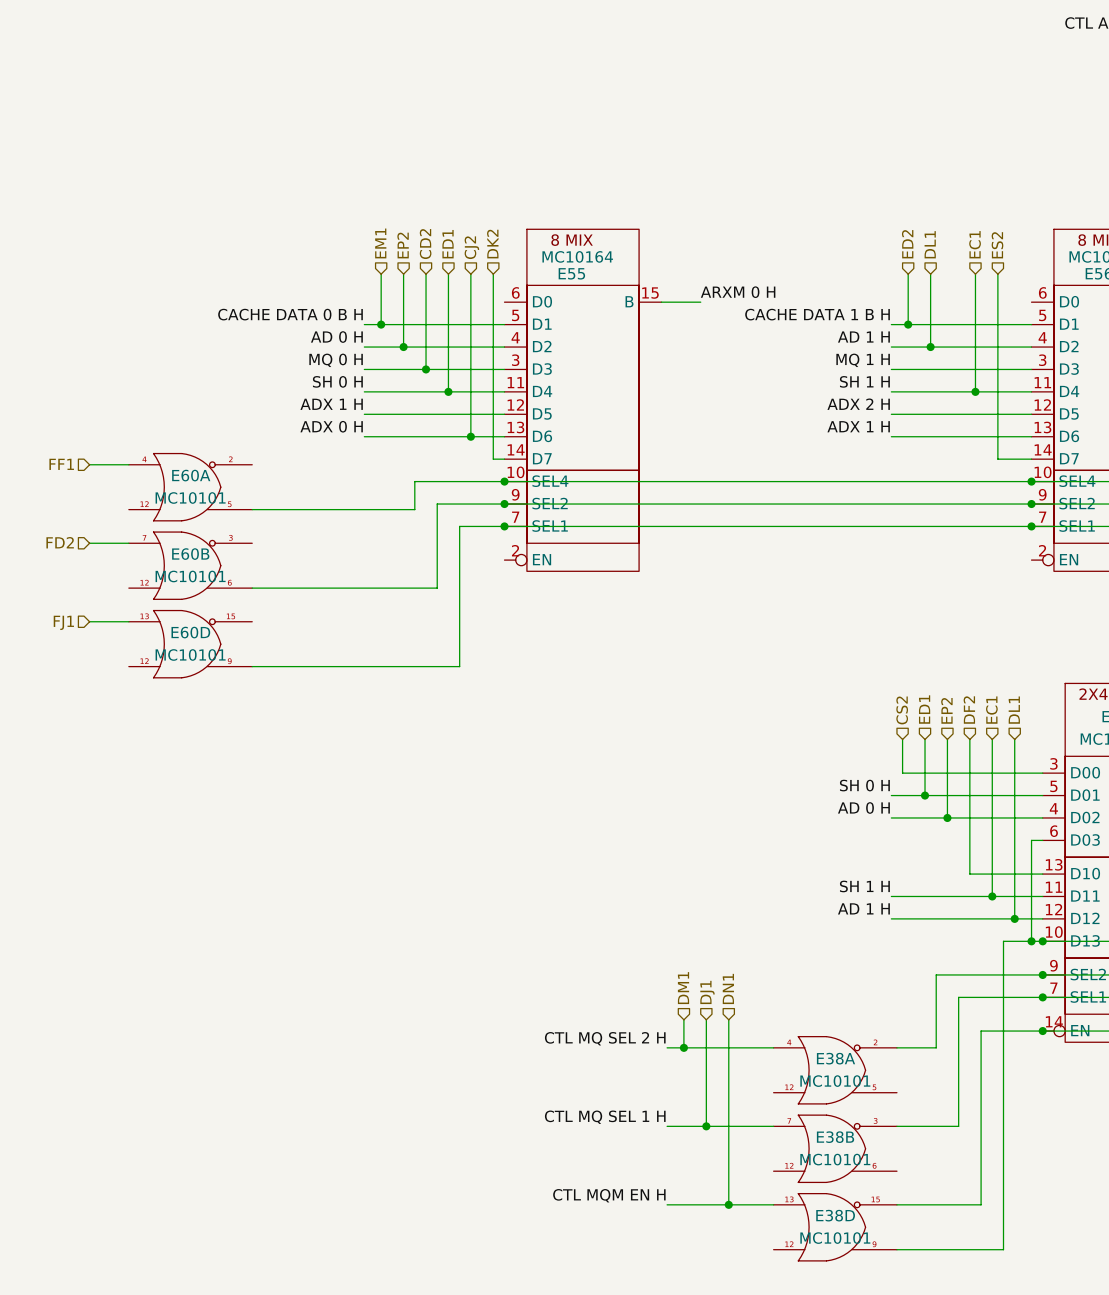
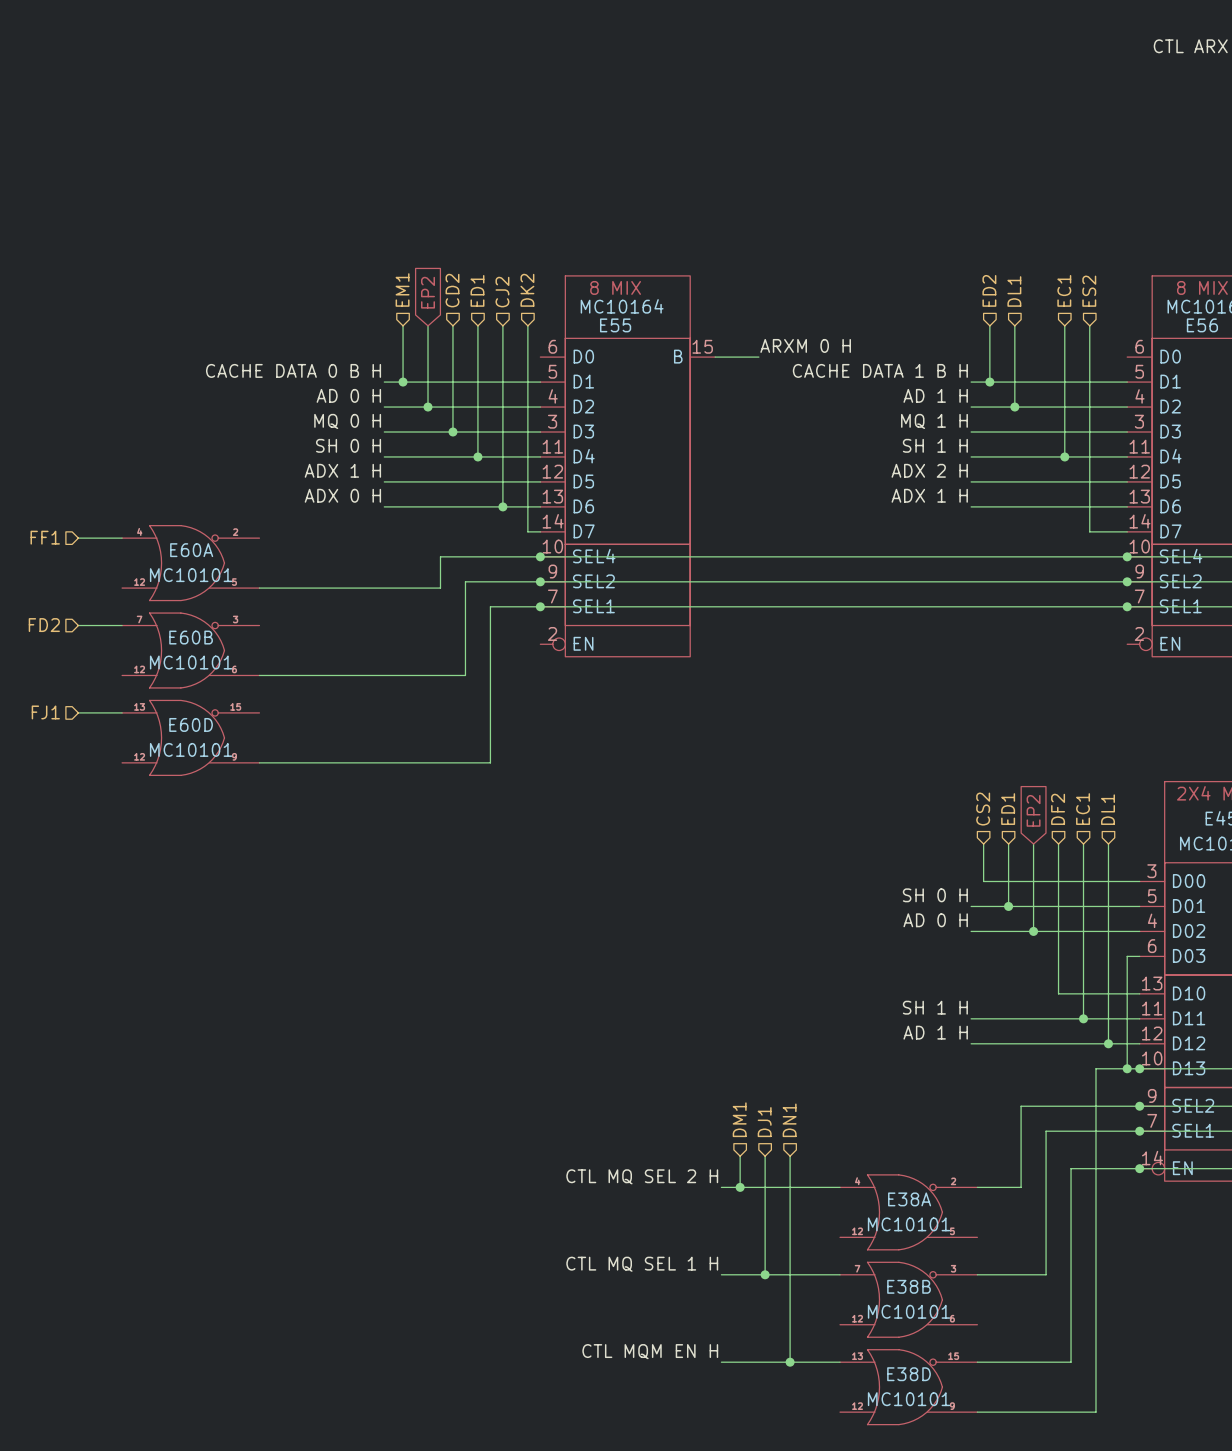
hierarchical label: EP2 (403, 245) -> none
global label: none -> EP2 (428, 292)
hierarchical label: EP2 (946, 710) -> none
global label: none -> EP2 (1033, 810)

